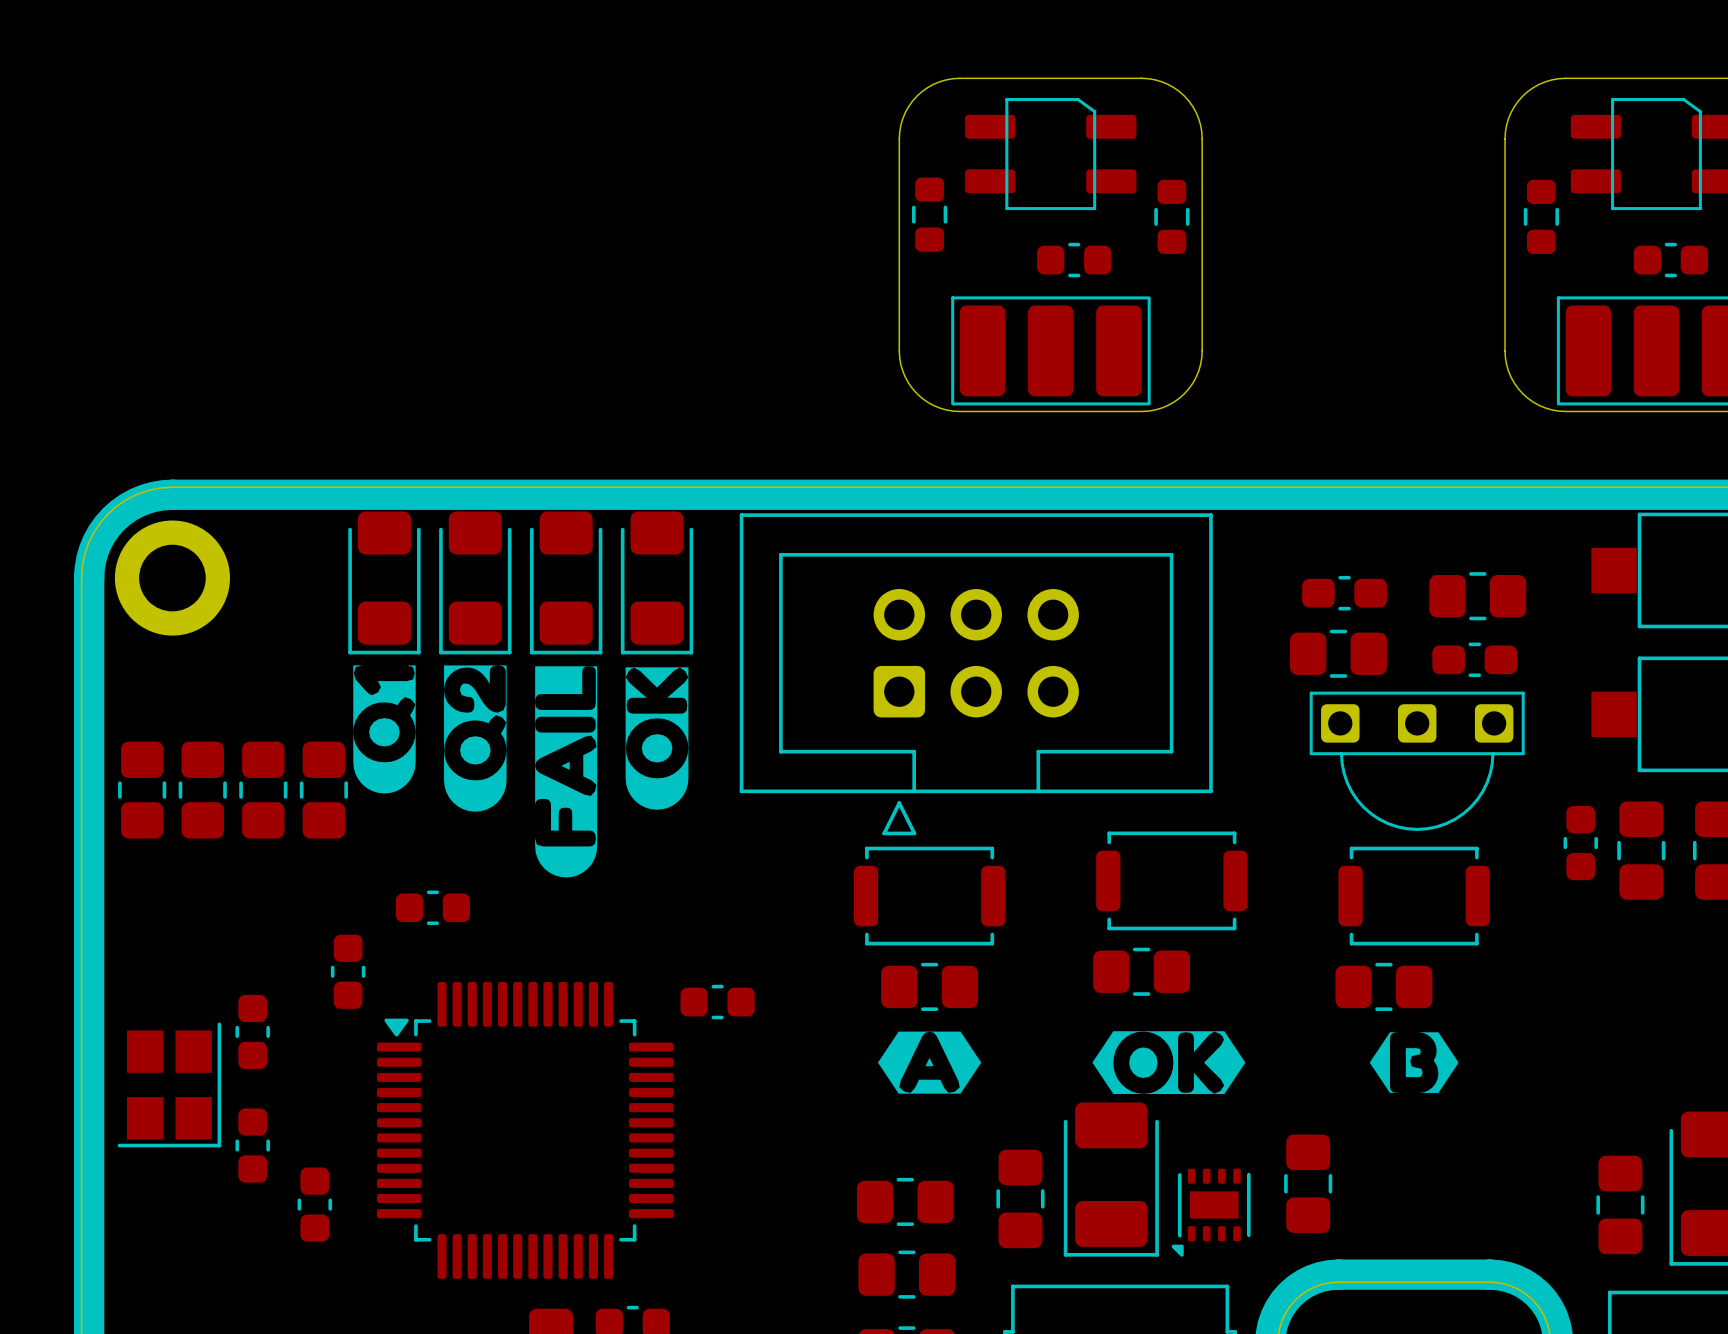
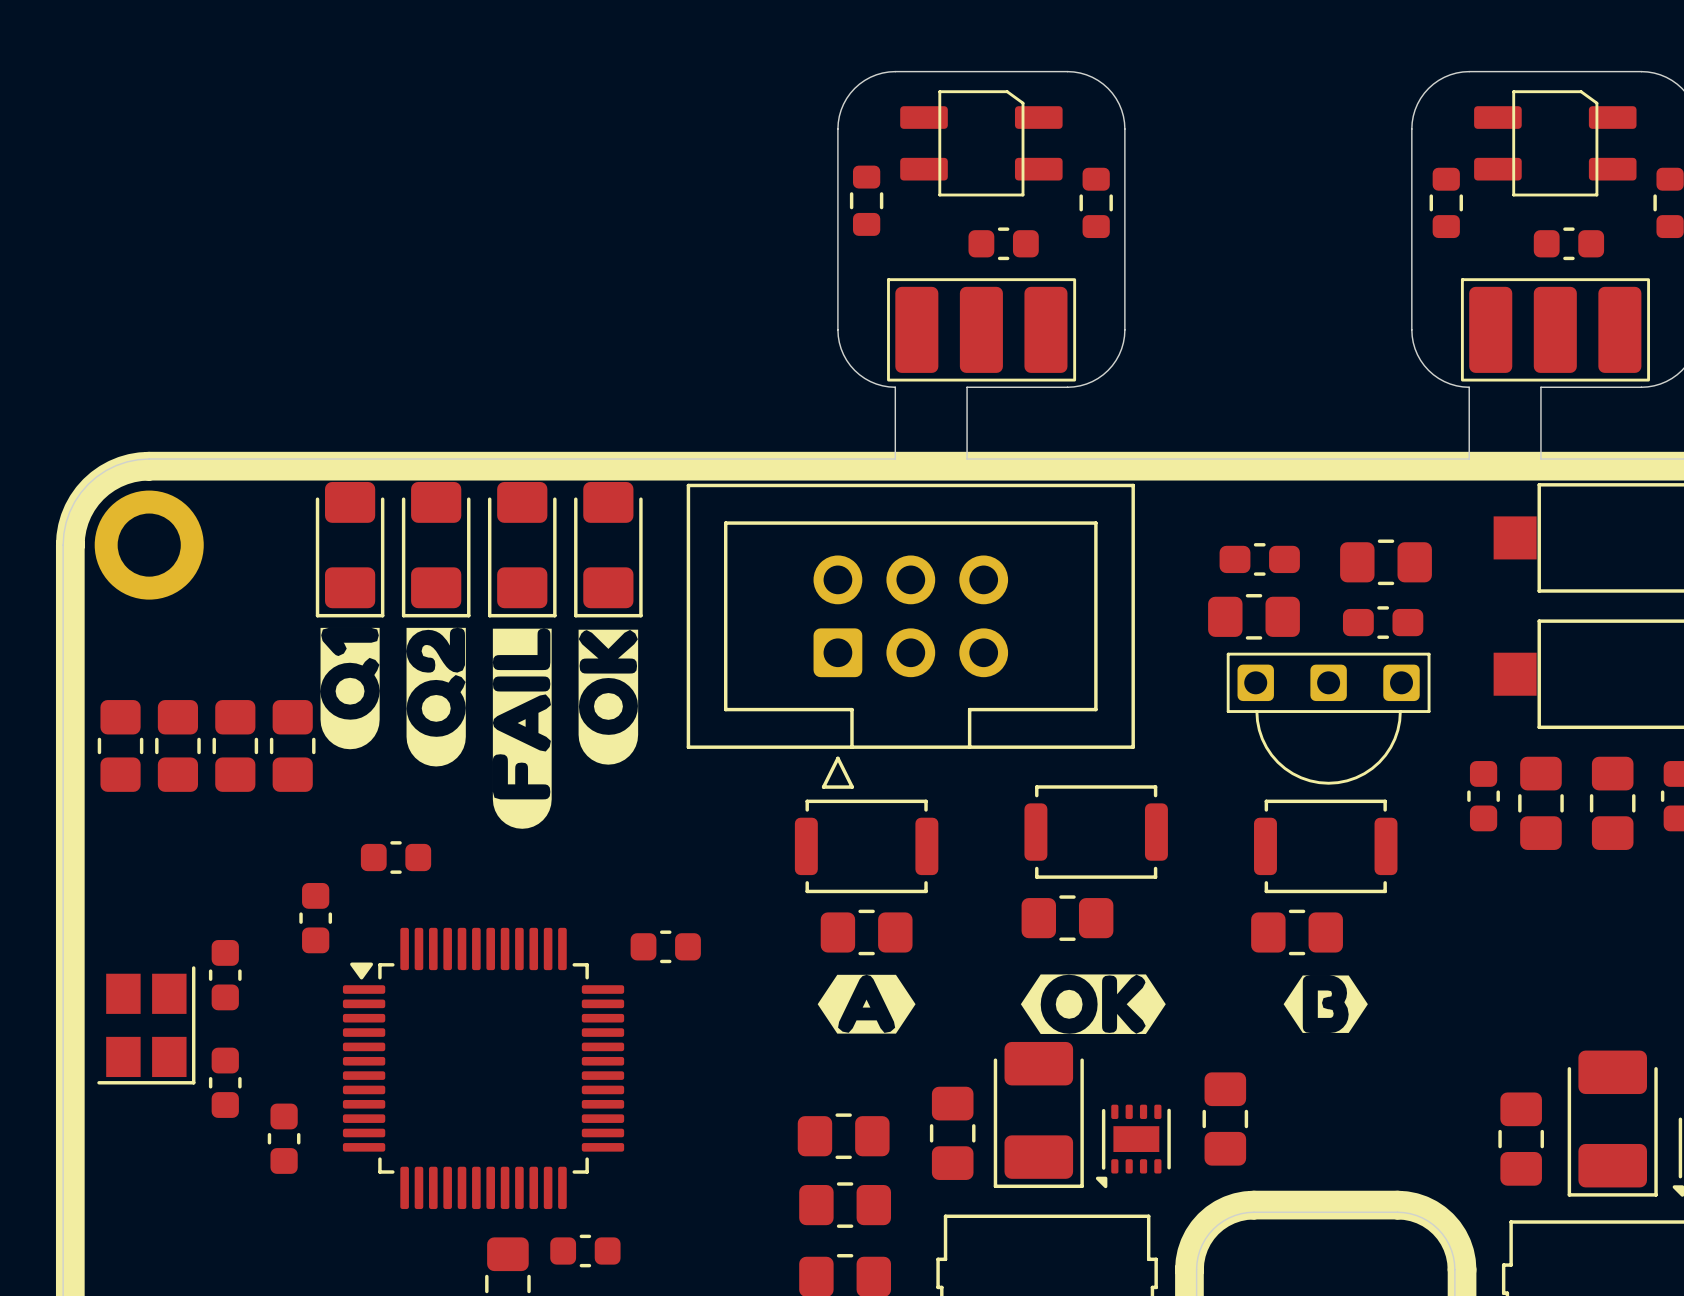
board edge: (959, 411) (1035, 411) -> (895, 387) (895, 459)
board edge: (1565, 411) (1641, 411) -> (1469, 387) (1469, 459)
board edge: (959, 487) (1035, 487) -> (967, 387) (967, 459)
board edge: (1565, 487) (1641, 487) -> (1540, 387) (1540, 459)

